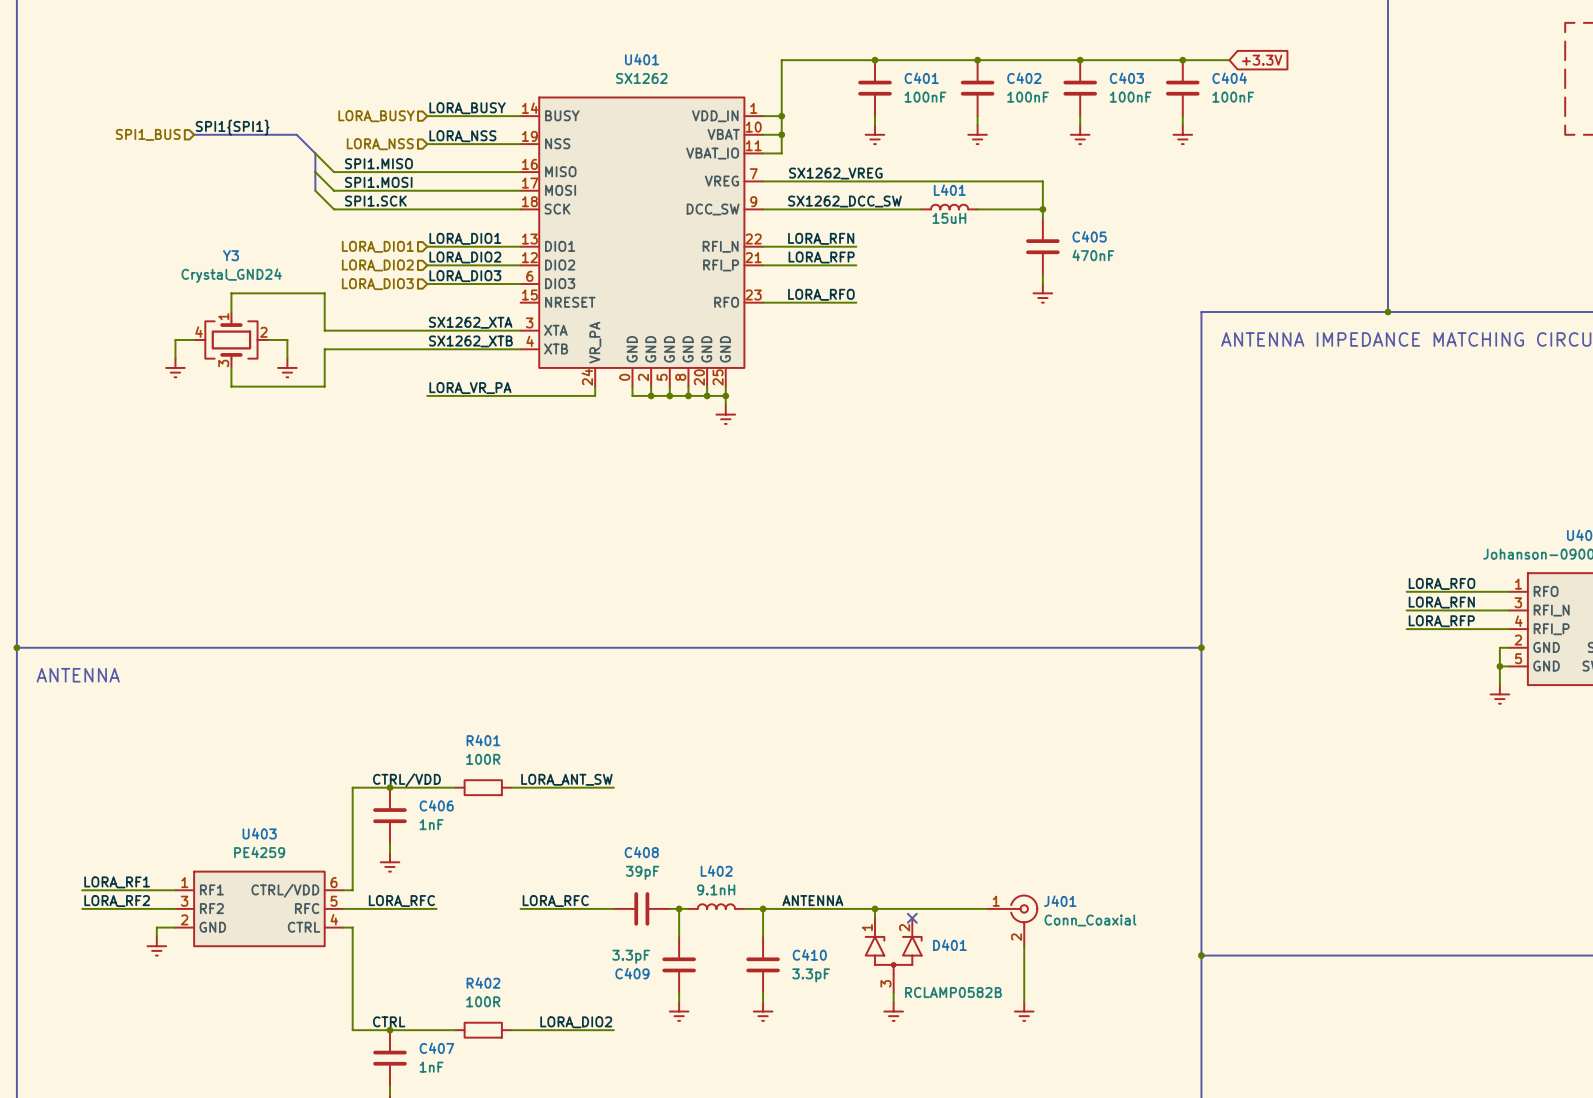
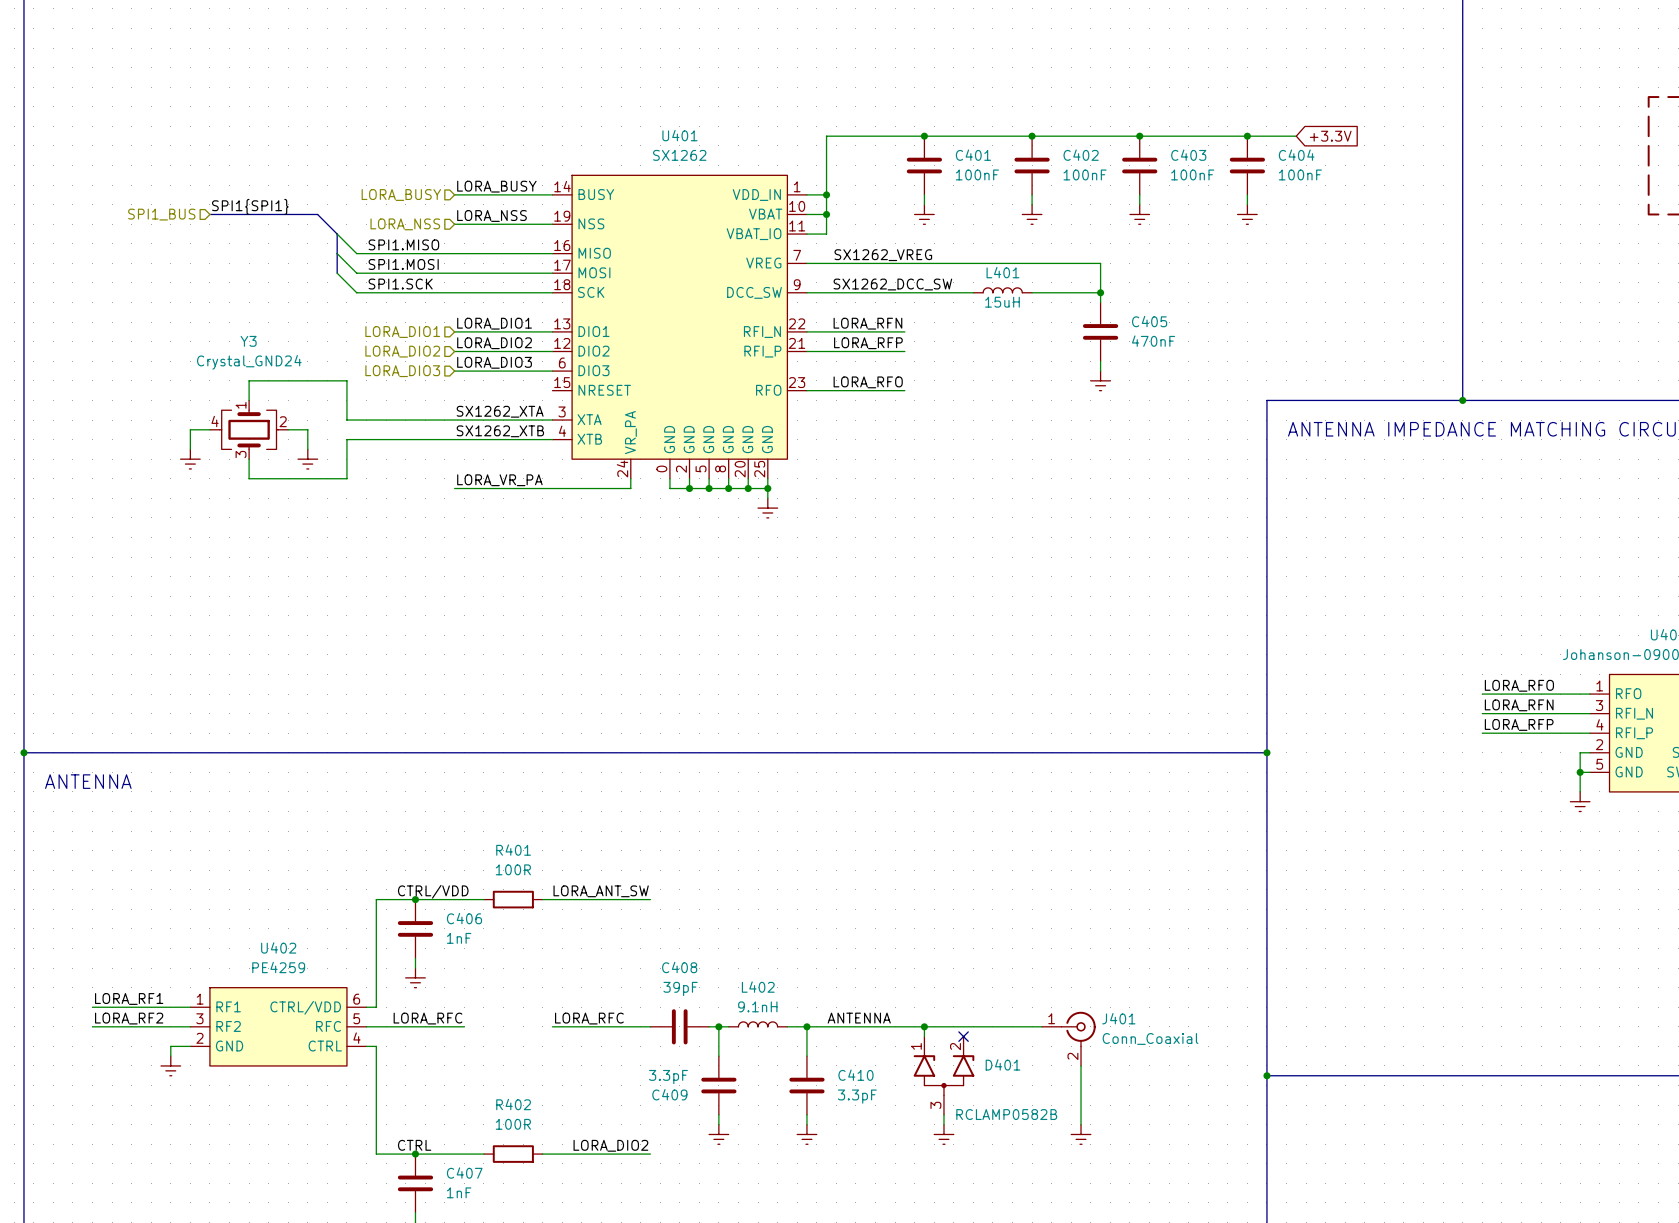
U403 name: U403 (259, 833) -> U402 (278, 947)

